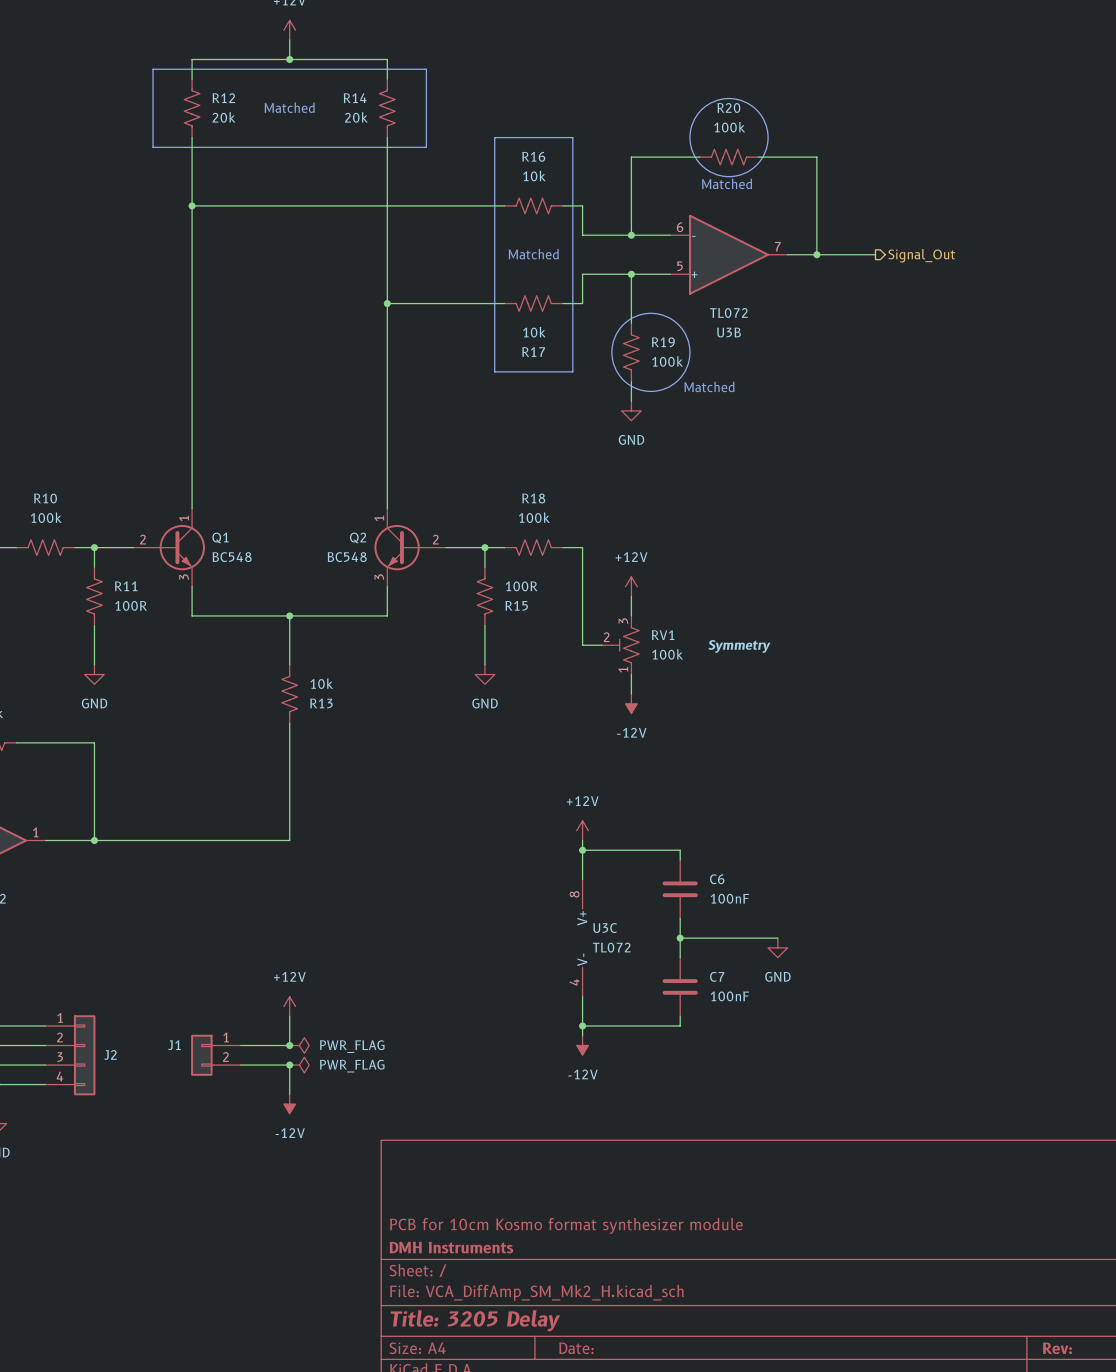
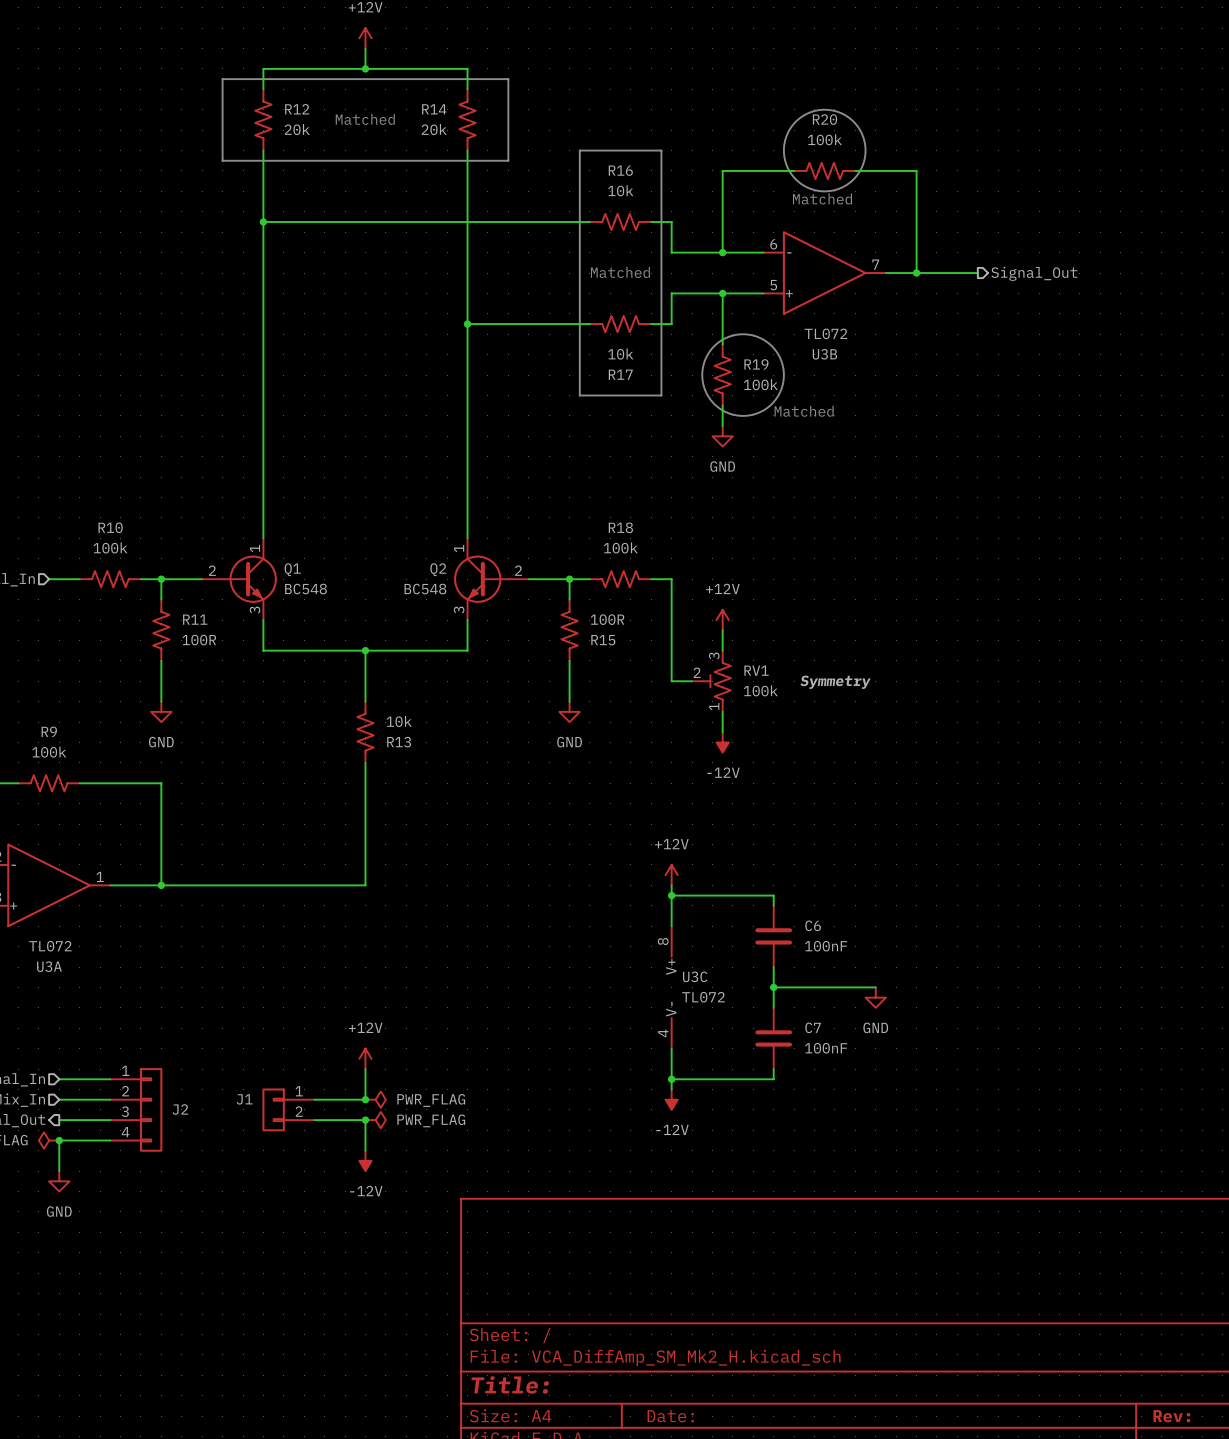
title block: PCB for 10cm Kosmo format synthesizer module (566, 1225) -> none
title block: DMH Instruments (451, 1247) -> none
title block: Title: 3205 Delay (475, 1320) -> Title: (510, 1384)

